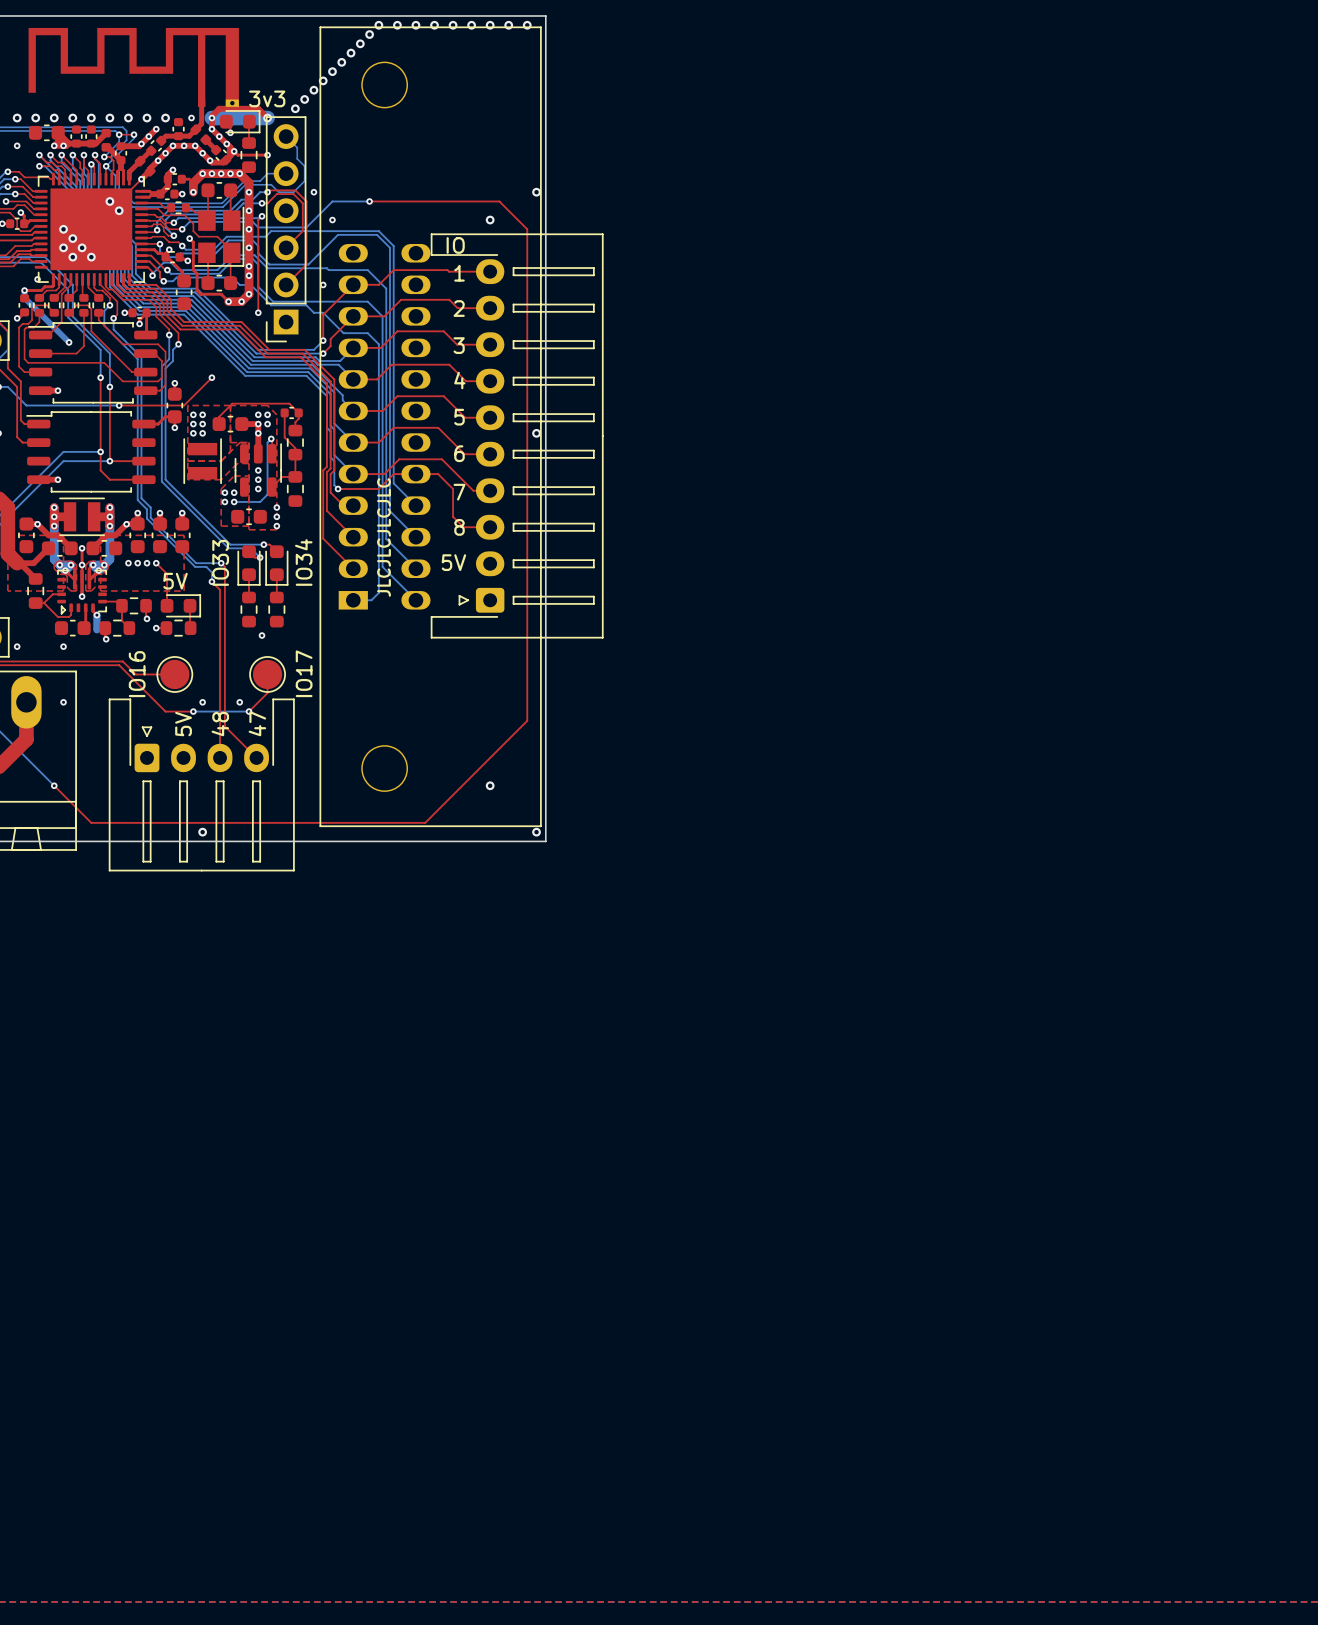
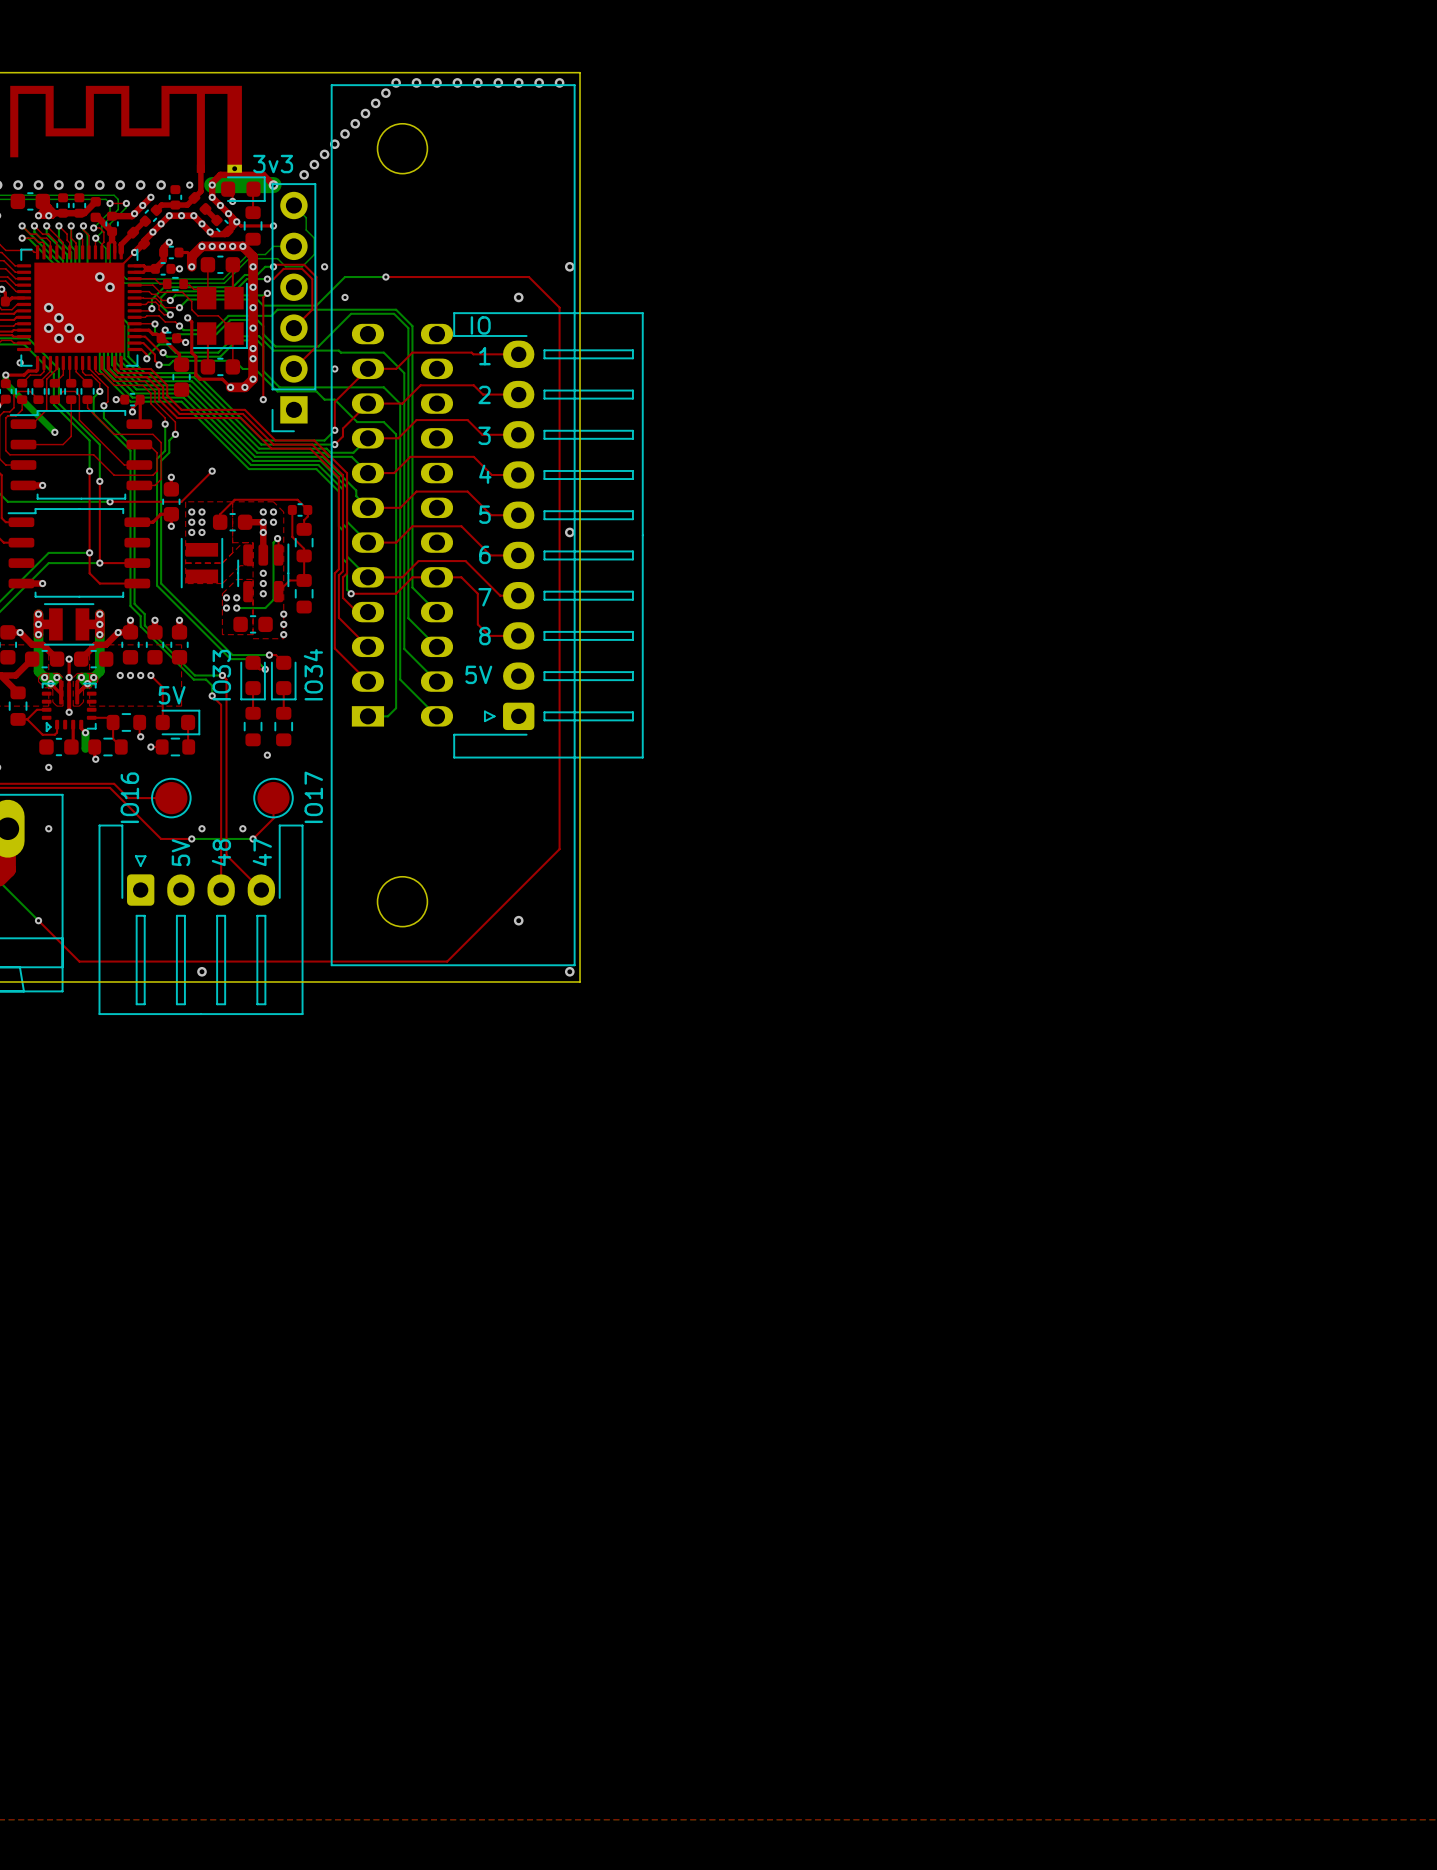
text: JLCJLCJLCJLC (383, 537) -> none

